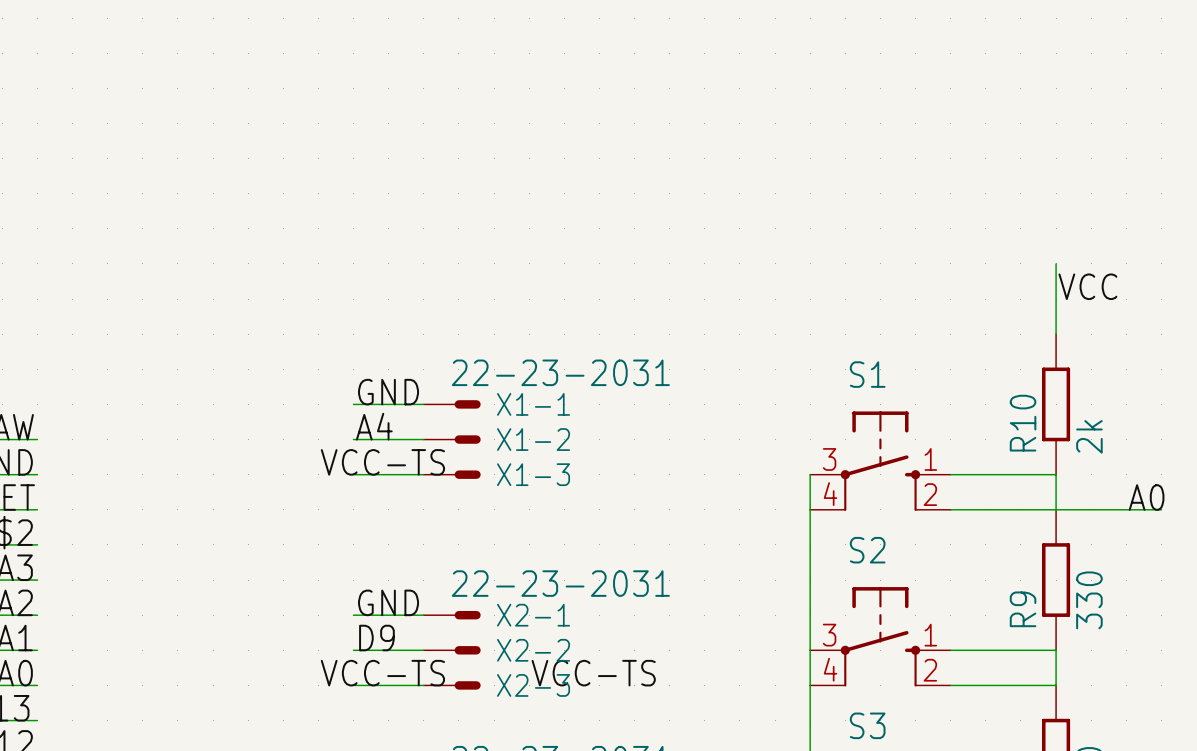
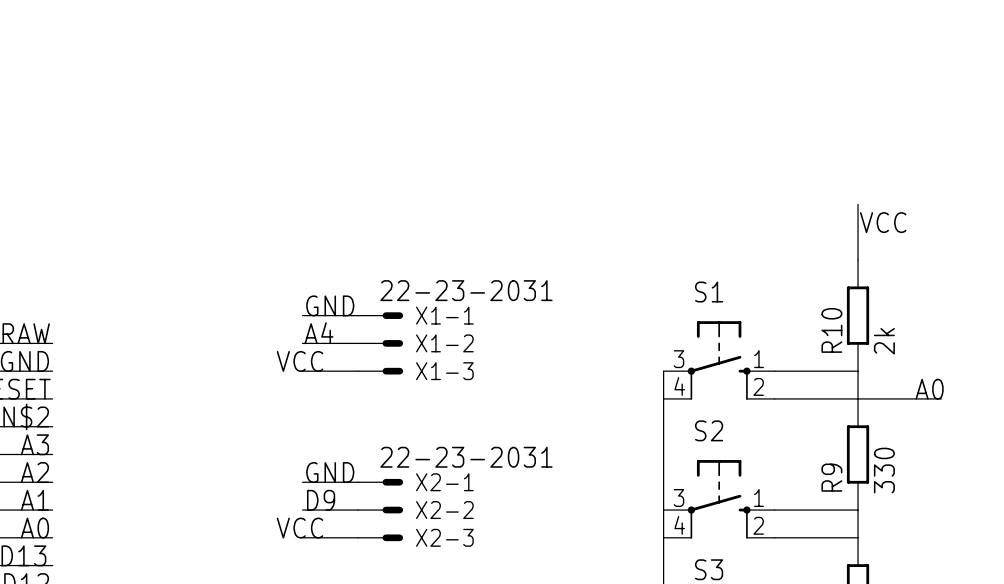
label: VCC-TS (382, 462) -> VCC (299, 361)
label: VCC-TS (382, 673) -> VCC (299, 528)
label: VCC-TS (593, 673) -> none

